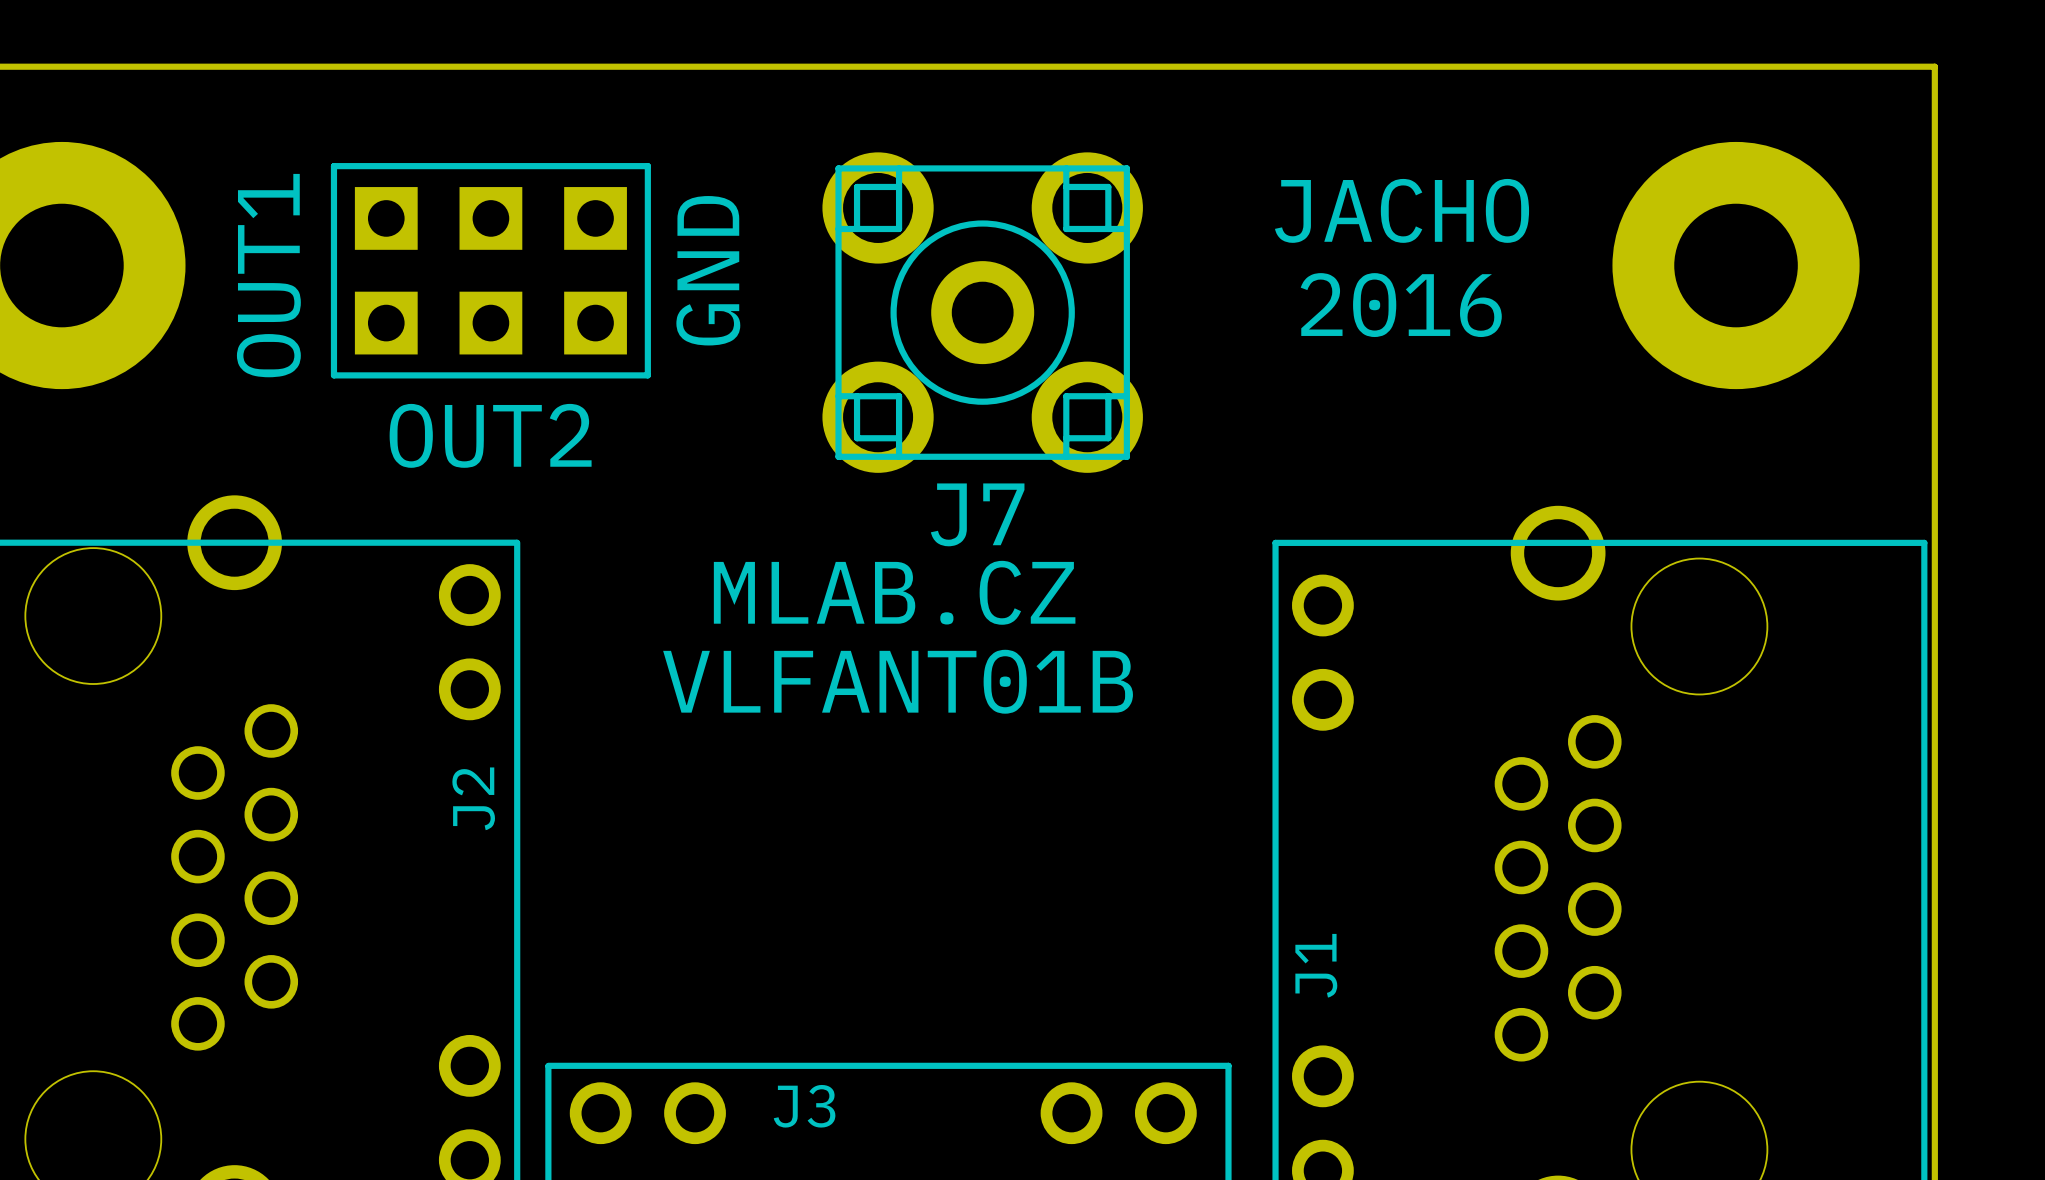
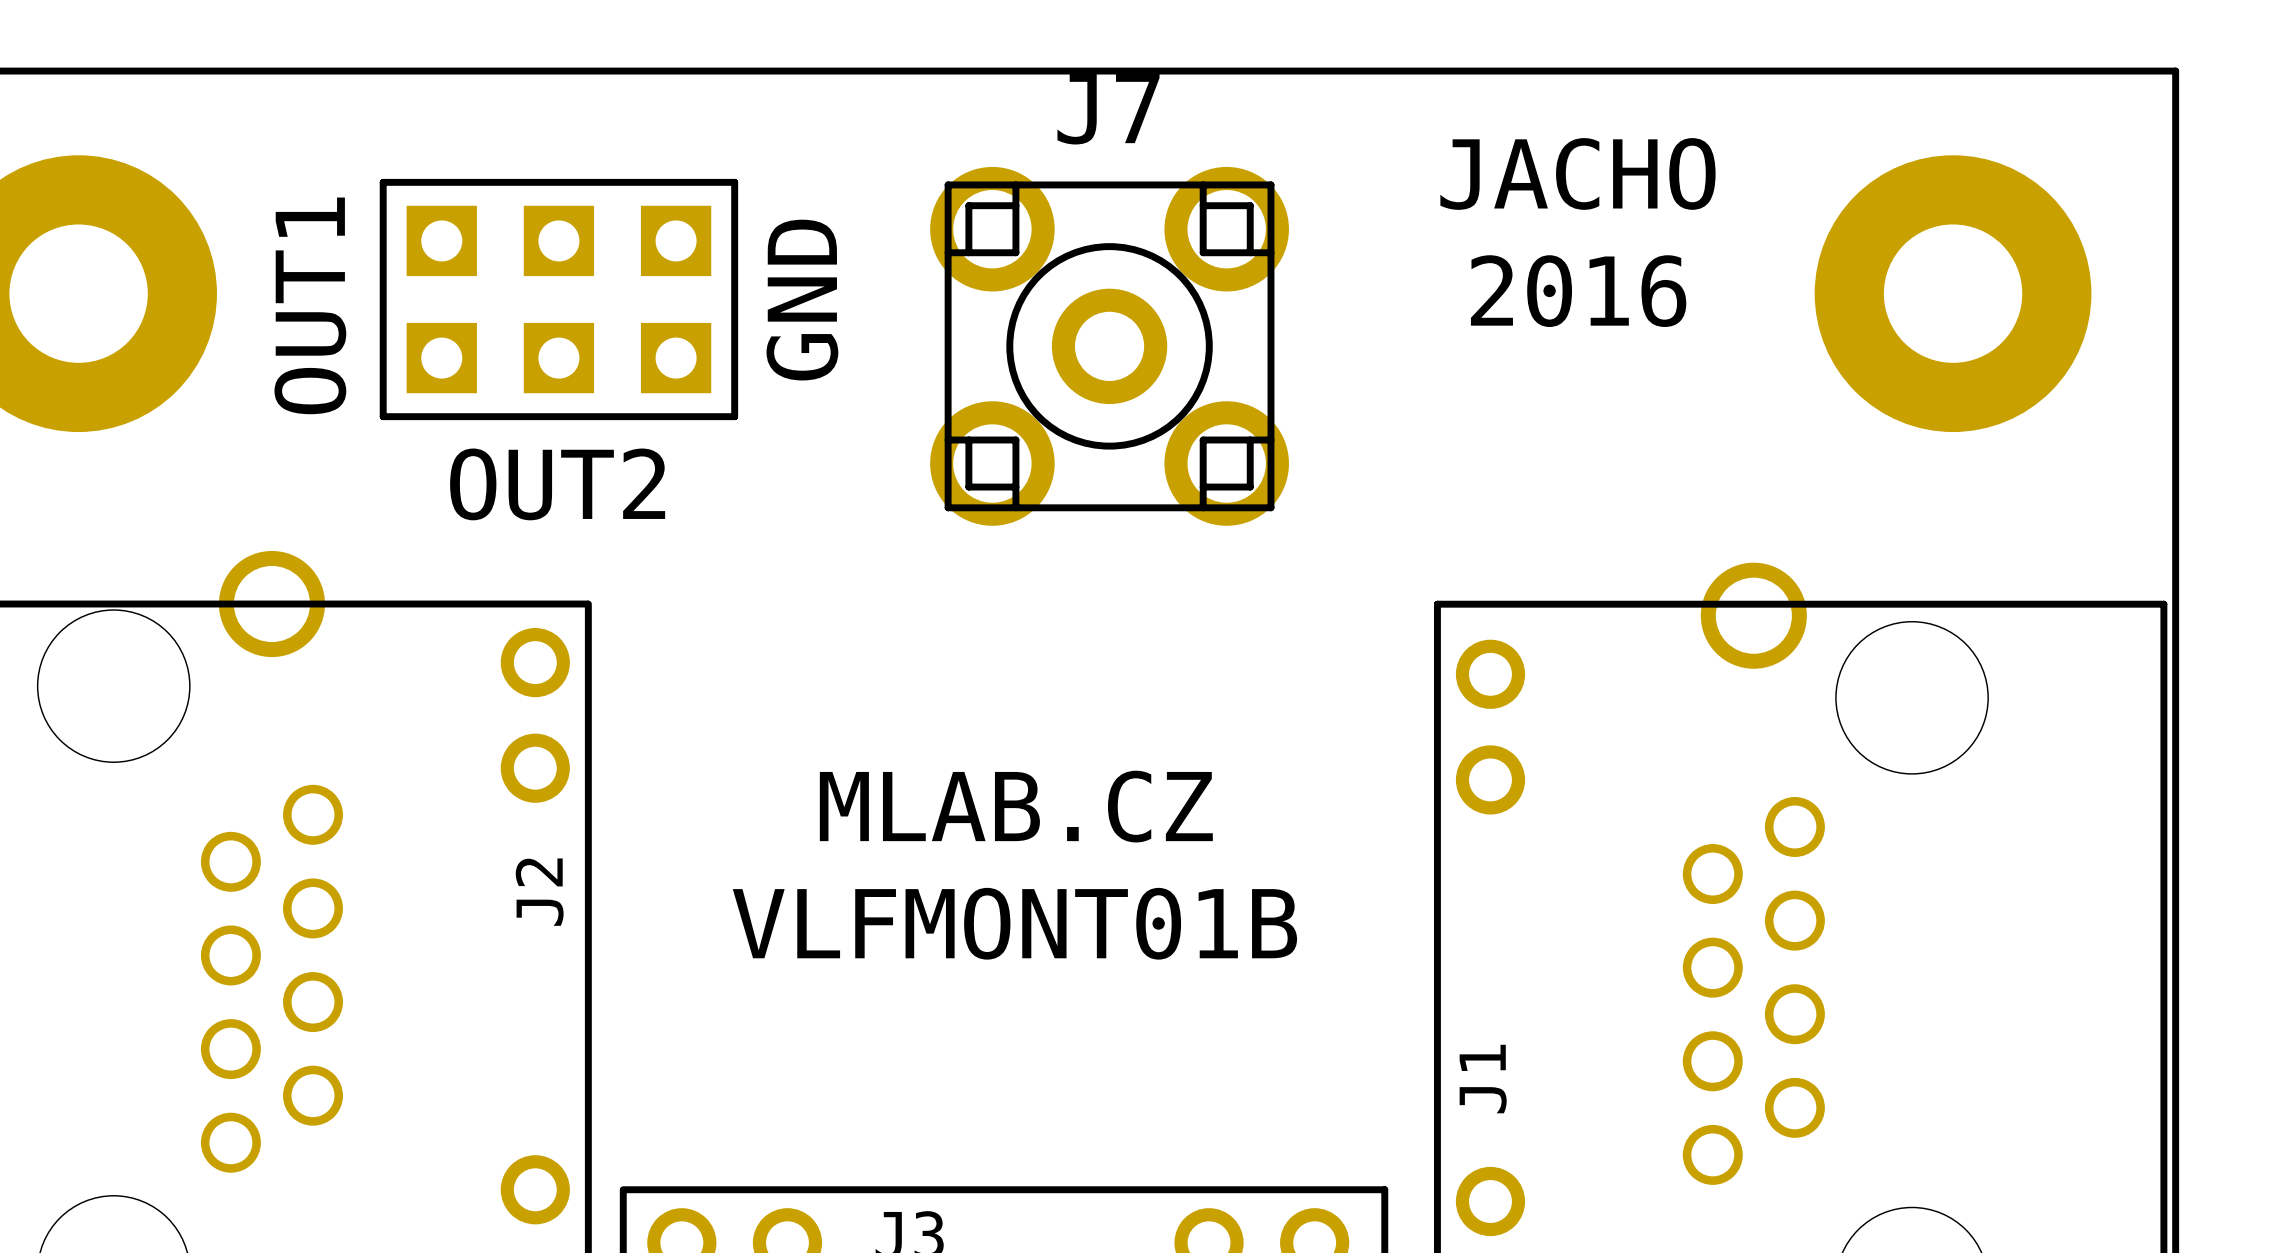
text position: JACHO (1402, 210) -> JACHO (1577, 173)
text position: 2016 (1401, 305) -> 2016 (1578, 291)
J7 name position: J7 (977, 514) -> J7 (1108, 109)
text position: MLAB.CZ (894, 592) -> MLAB.CZ (1016, 806)
text: VLFANT01B (898, 681) -> none
text: none -> VLFMONT01B (1014, 923)

